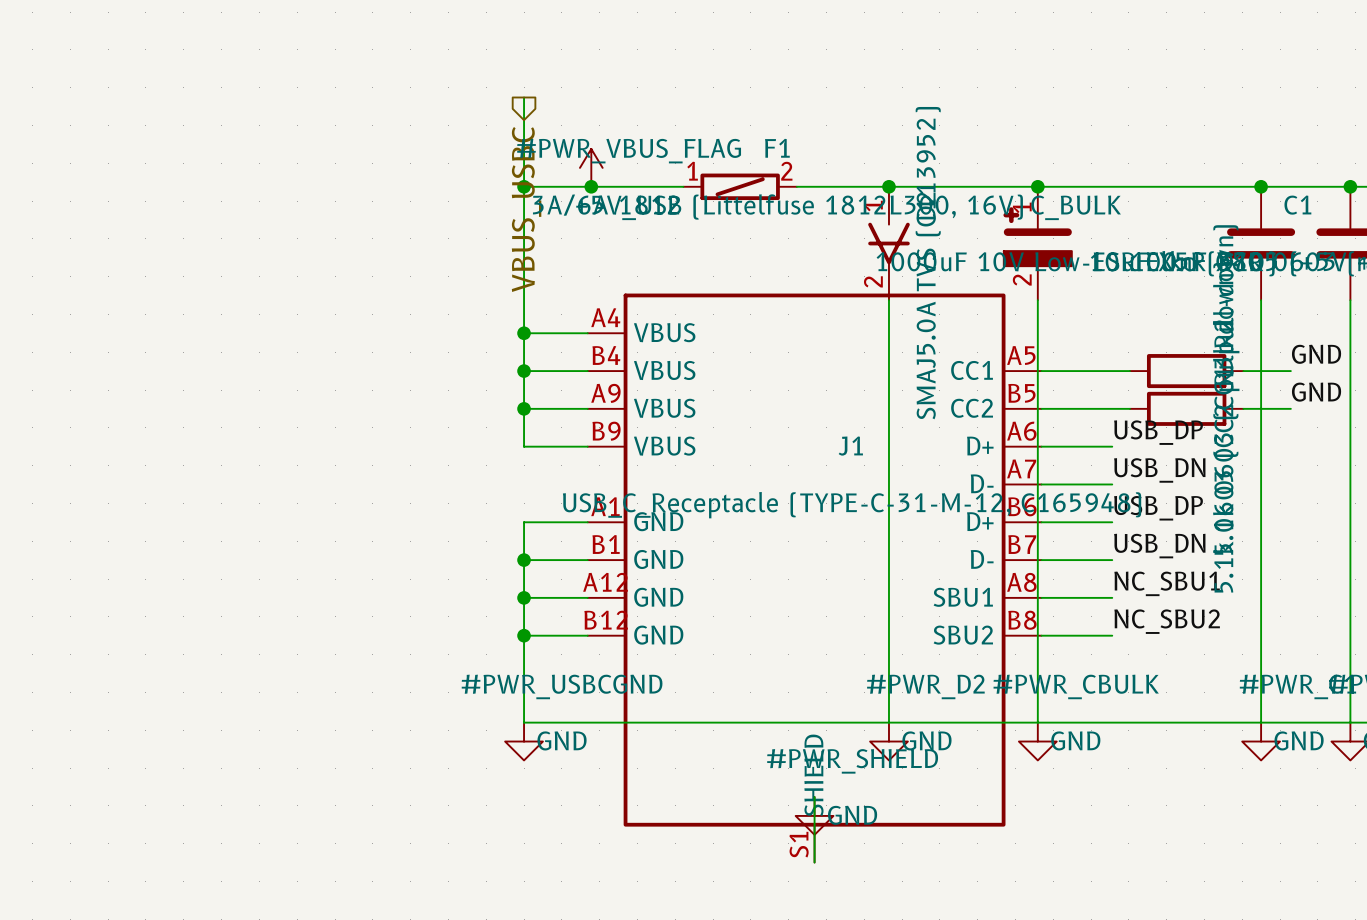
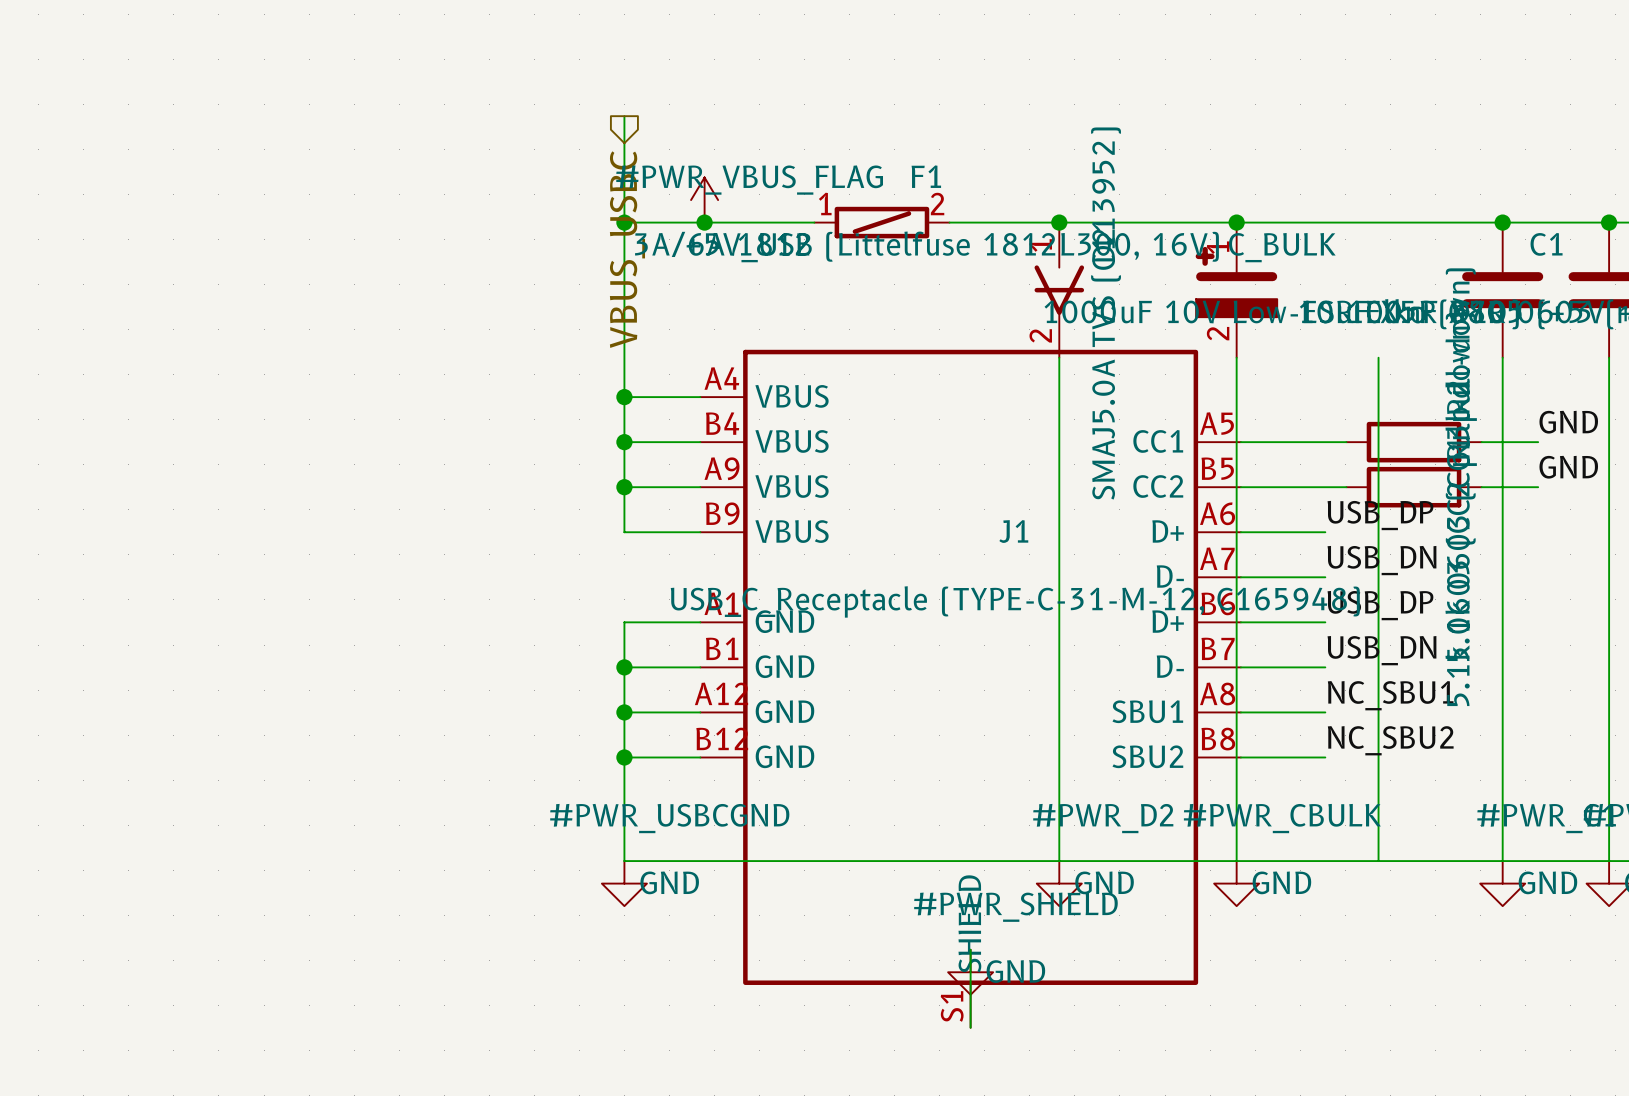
wire: none -> (1378, 357) (1378, 861)

